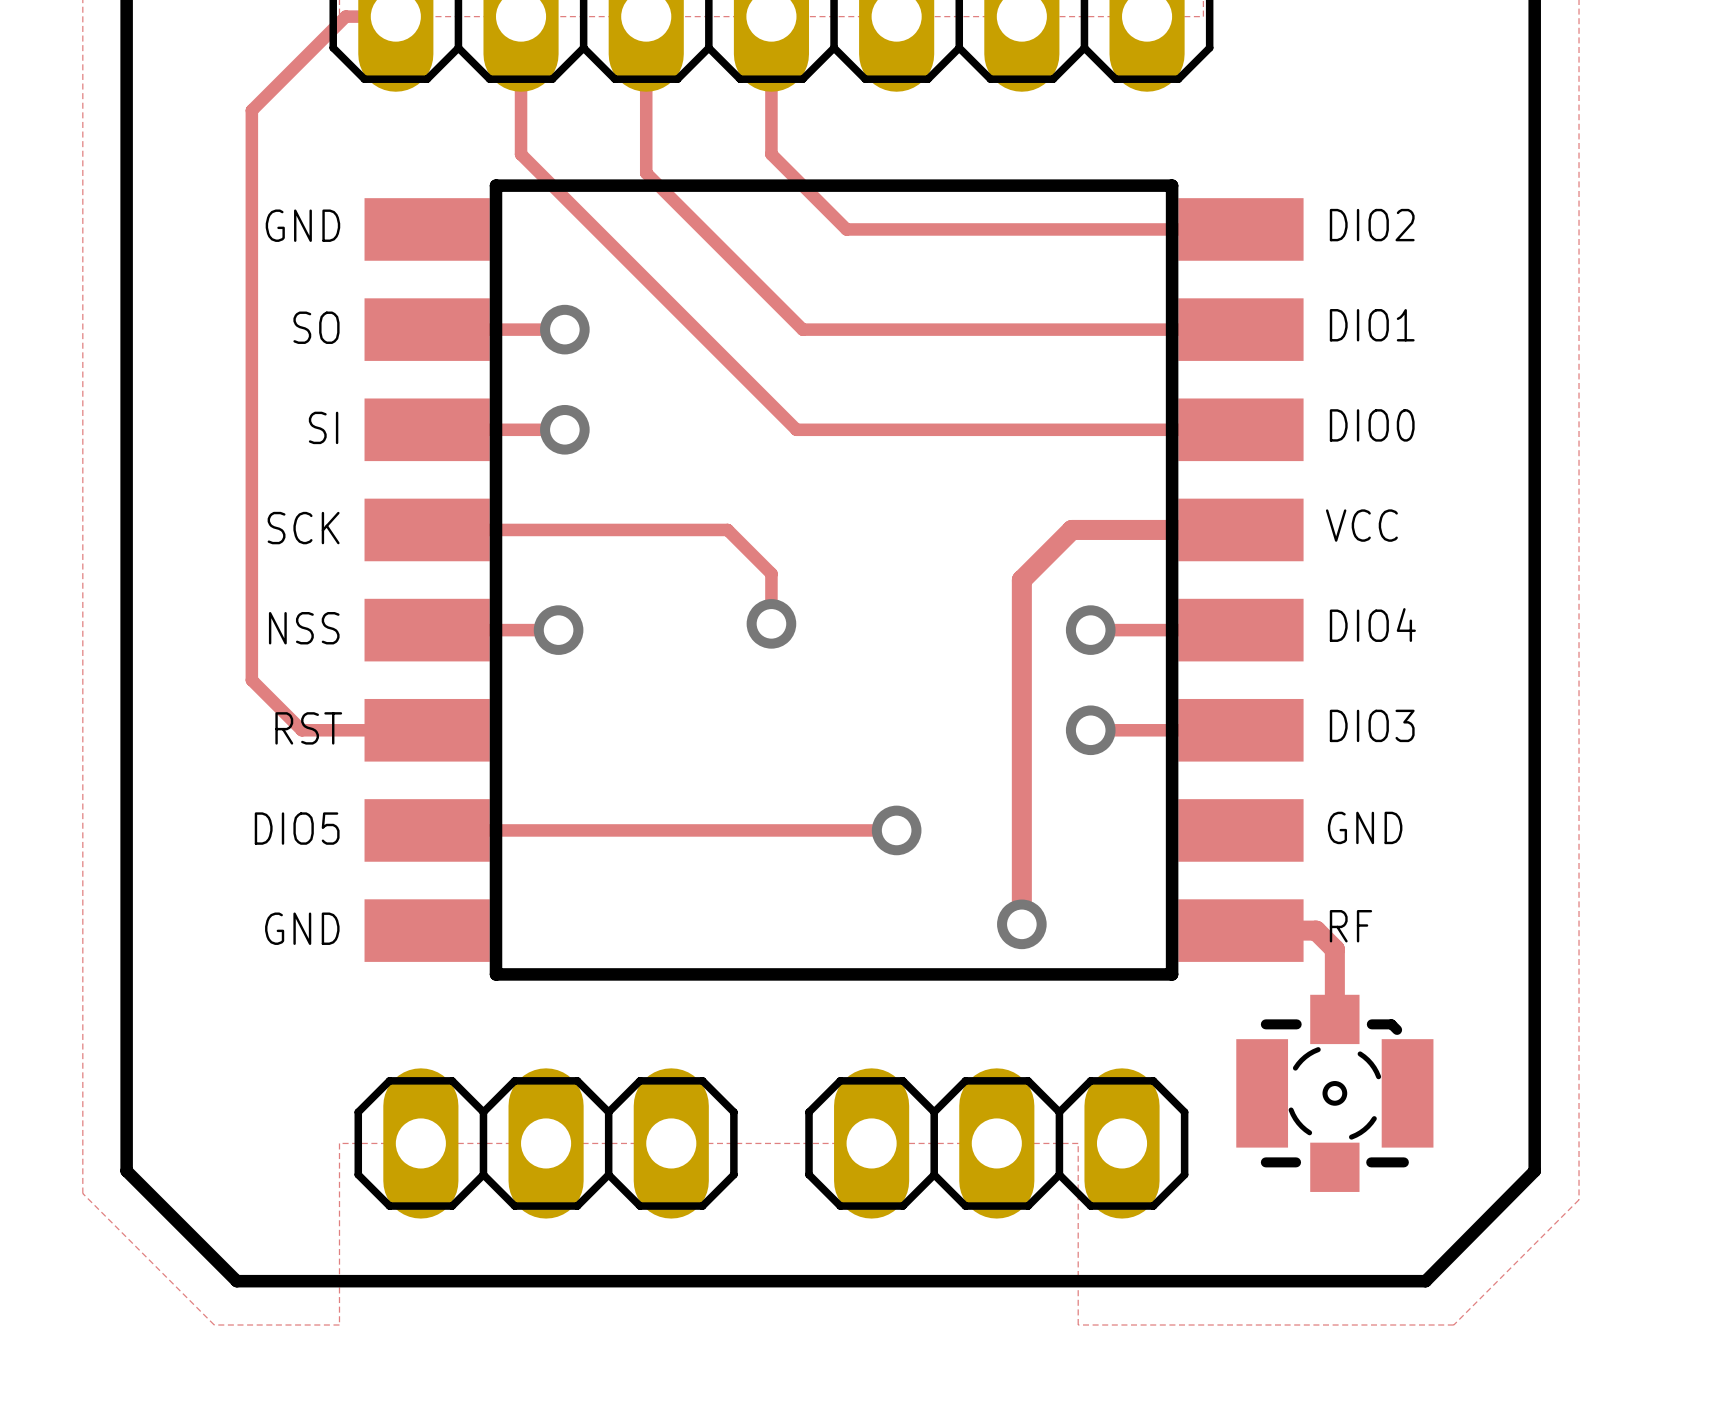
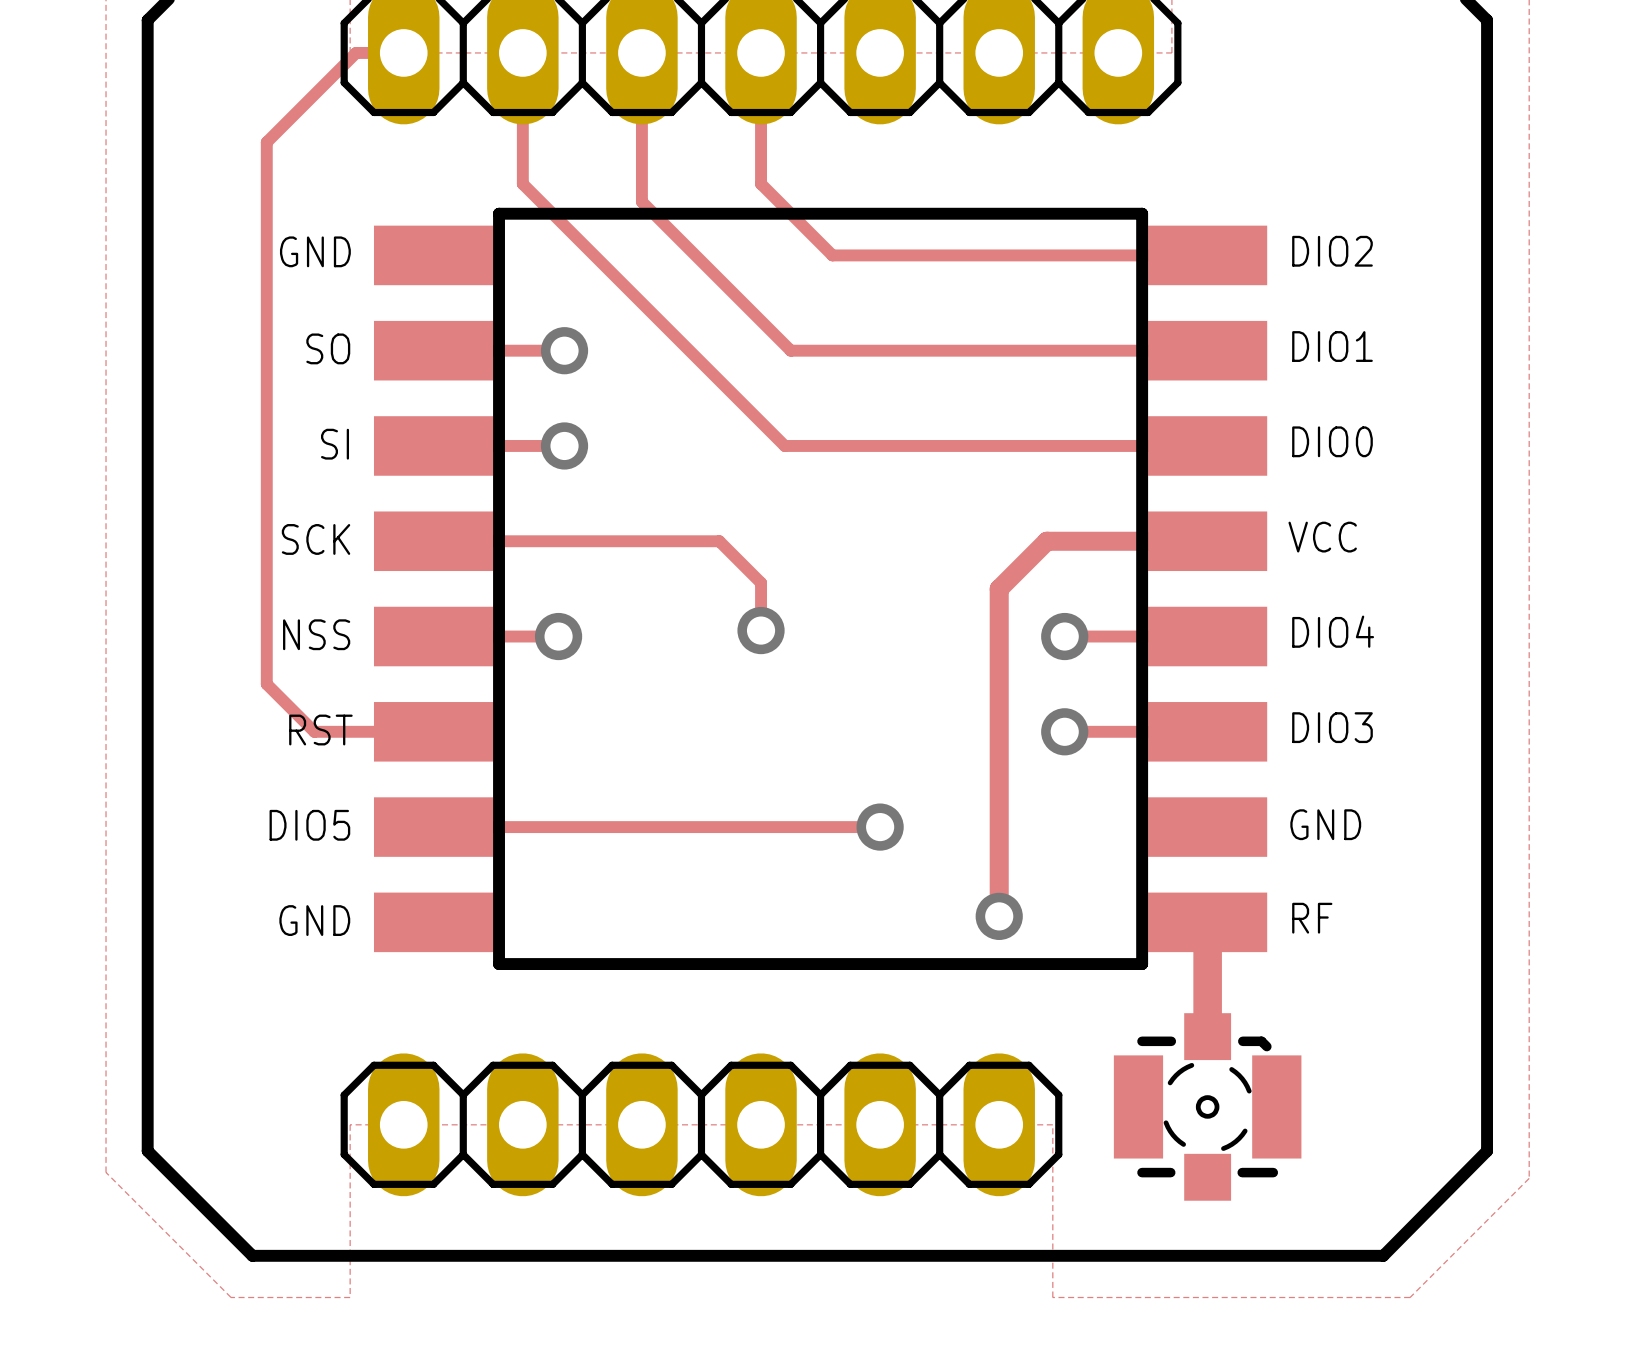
track: (1240, 930) (1316, 930) (1334, 949) (1334, 1019) -> (1207, 922) (1207, 1036)
part position: (1334, 1093) -> (1207, 1106)
part: (546, 1143) -> none
part: none -> (701, 1124)
part: (996, 1143) -> none

